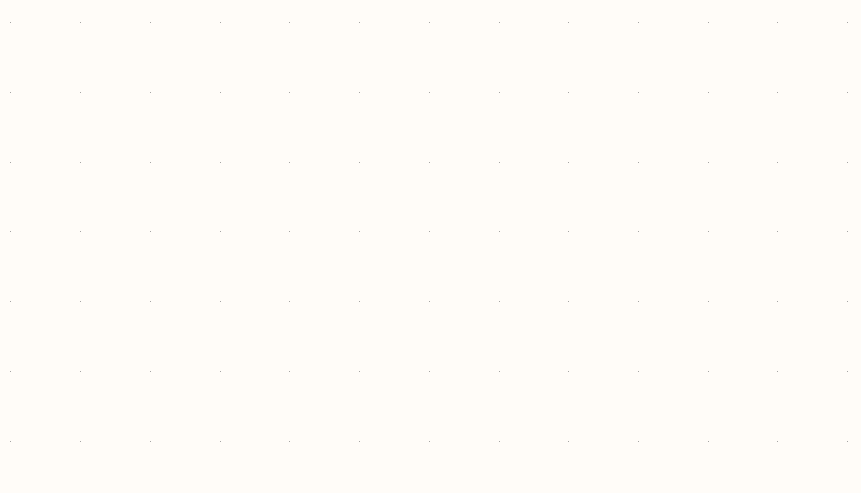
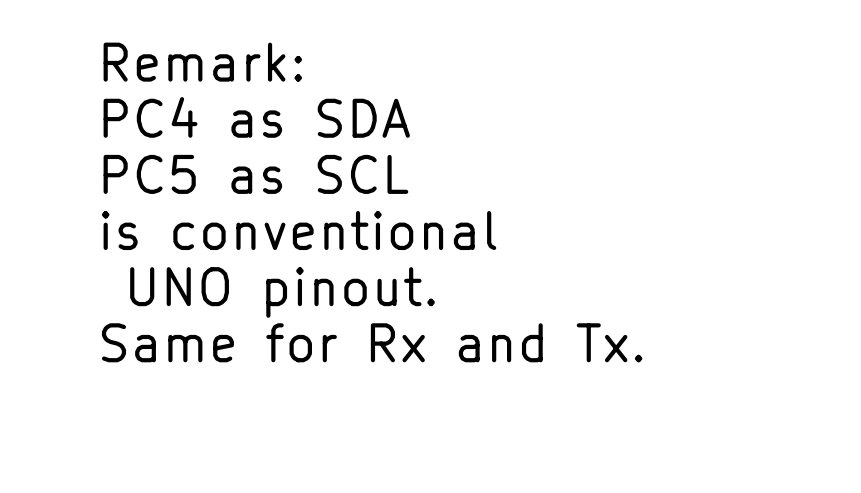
text: none -> Remark: (202, 62)
text: none -> PC4 as SDA (256, 117)
text: none -> PC5 as SCL (255, 174)
text: none -> is conventional (299, 230)
text: none -> UNO pinout. (282, 292)
text: none -> Same for Rx and Tx. (372, 342)

